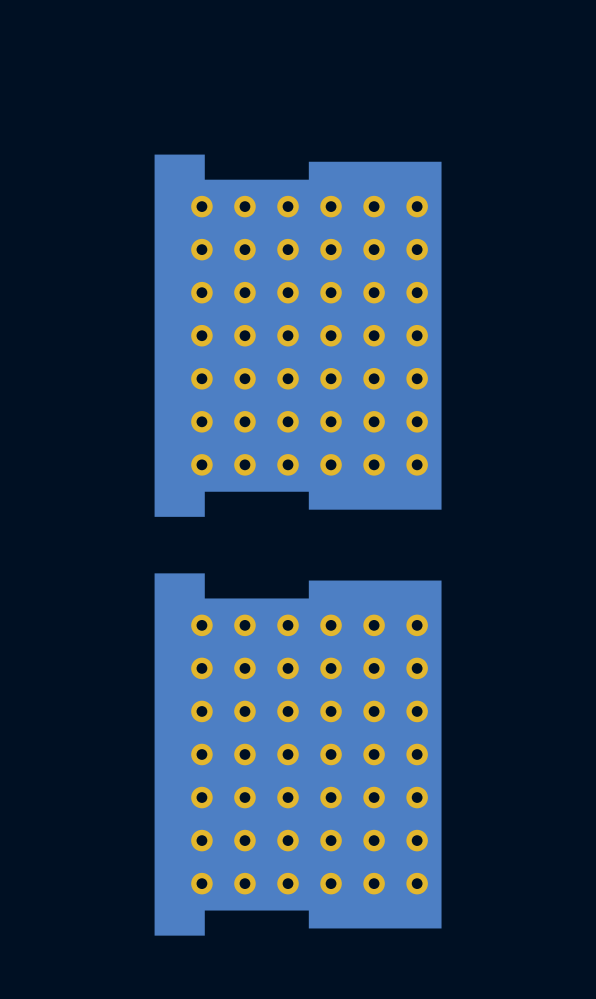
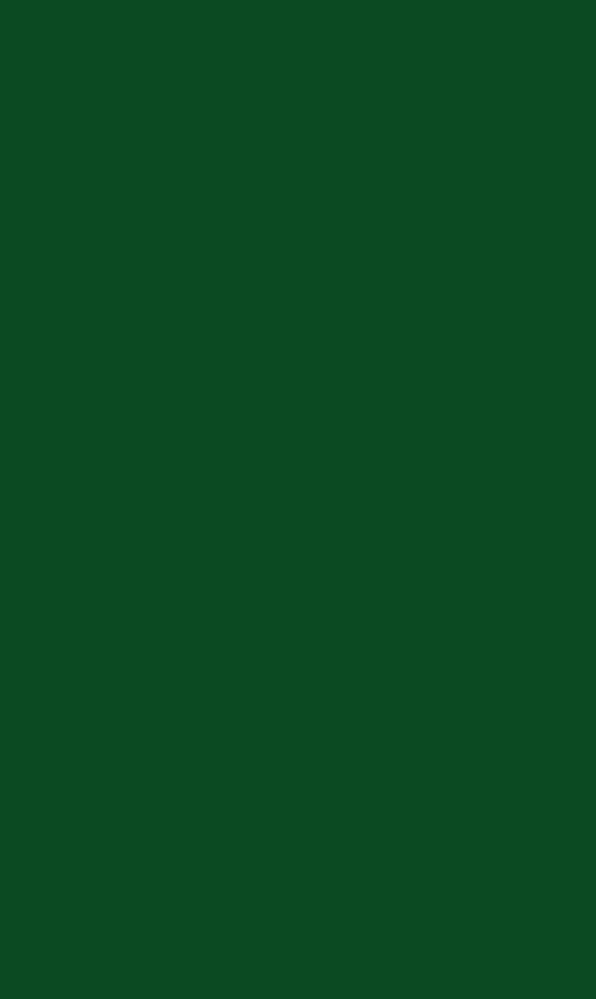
part: (298, 335) -> none
part: (298, 754) -> none

